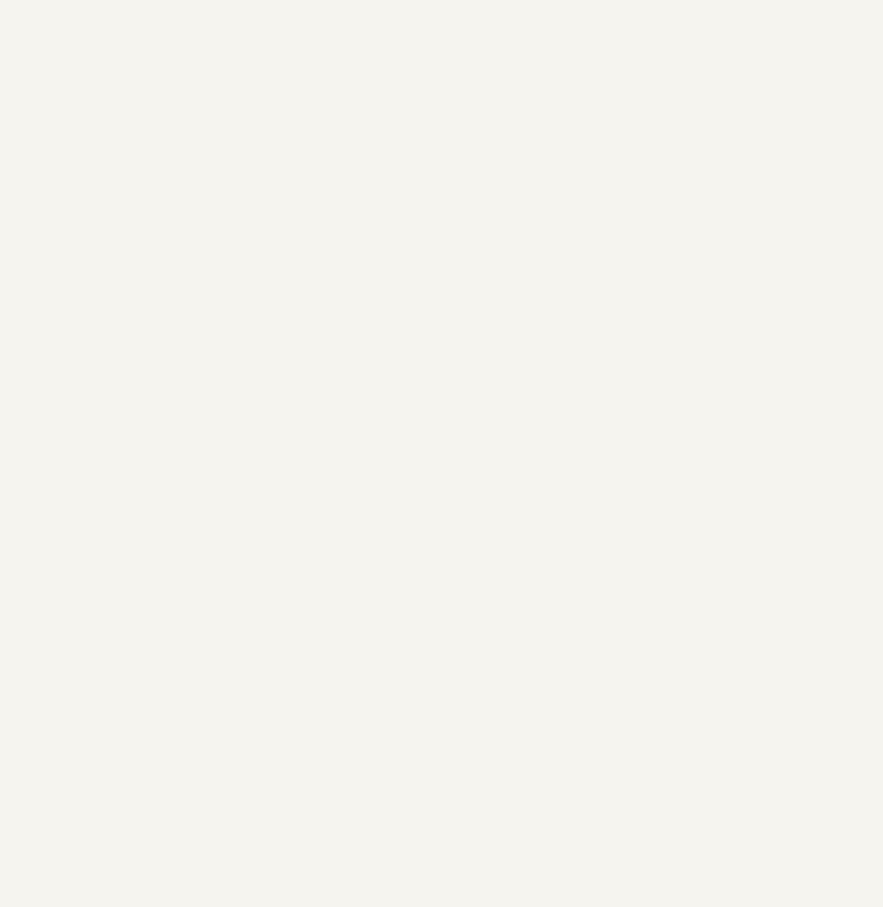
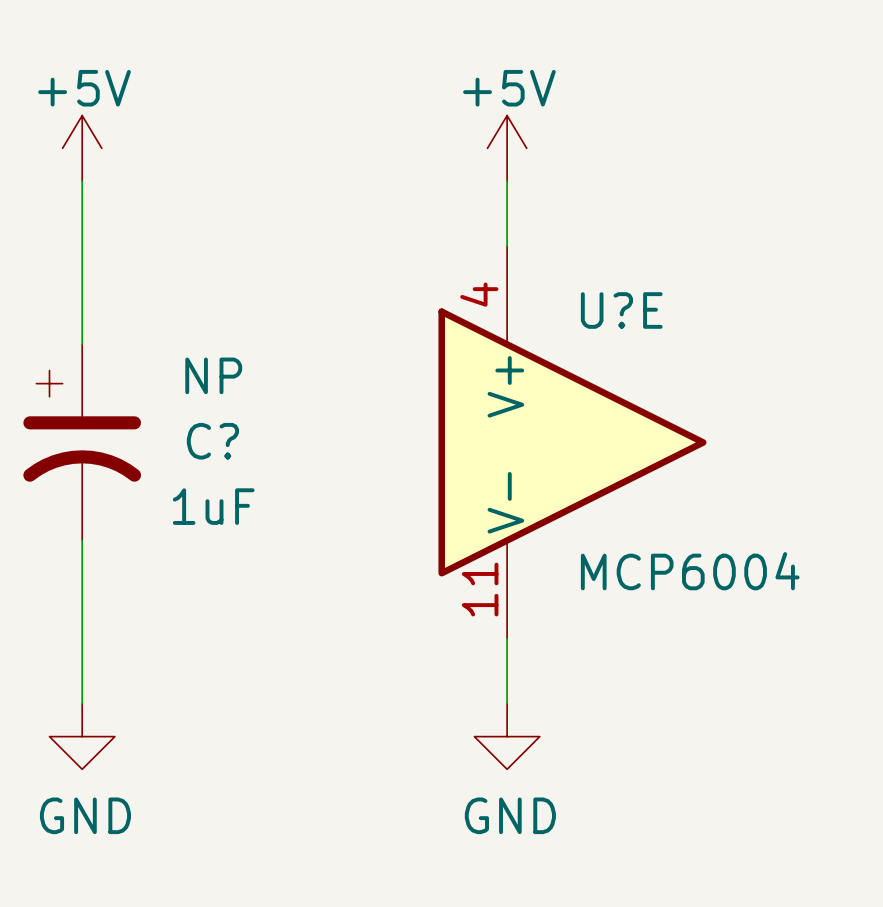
power symbol: none -> +5V (82, 148)
power symbol: none -> +5V (507, 148)
wire: none -> (82, 180) (82, 344)
wire: none -> (507, 180) (507, 246)
C?: none -> 1uF (82, 442)
U?E: none -> MCP6004 (572, 442)
wire: none -> (82, 540) (82, 703)
wire: none -> (507, 638) (507, 703)
power symbol: none -> GND (82, 736)
power symbol: none -> GND (507, 736)

